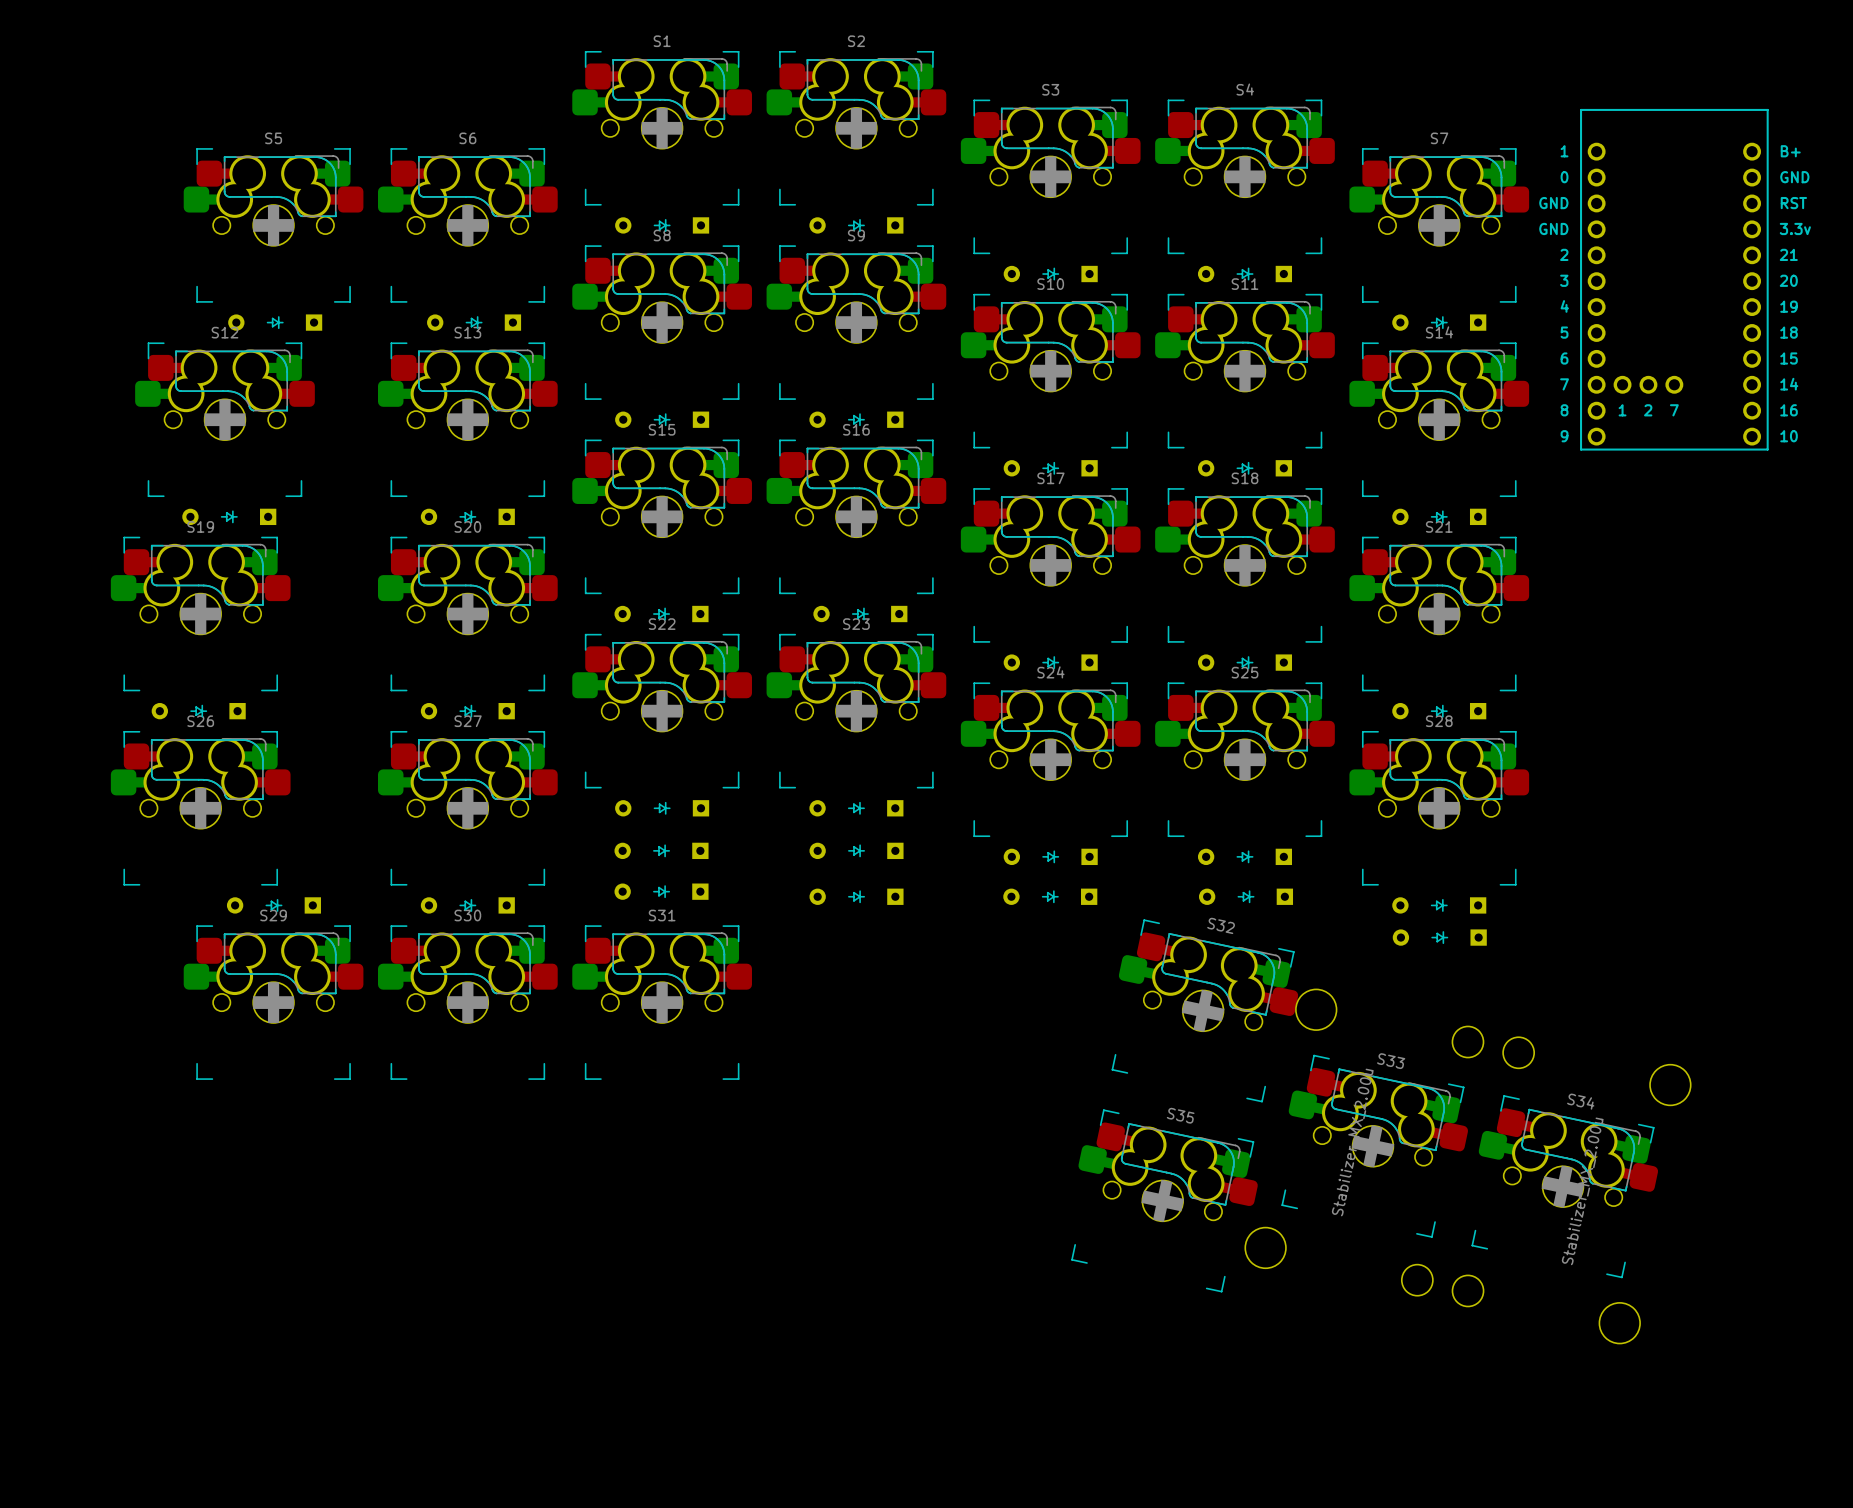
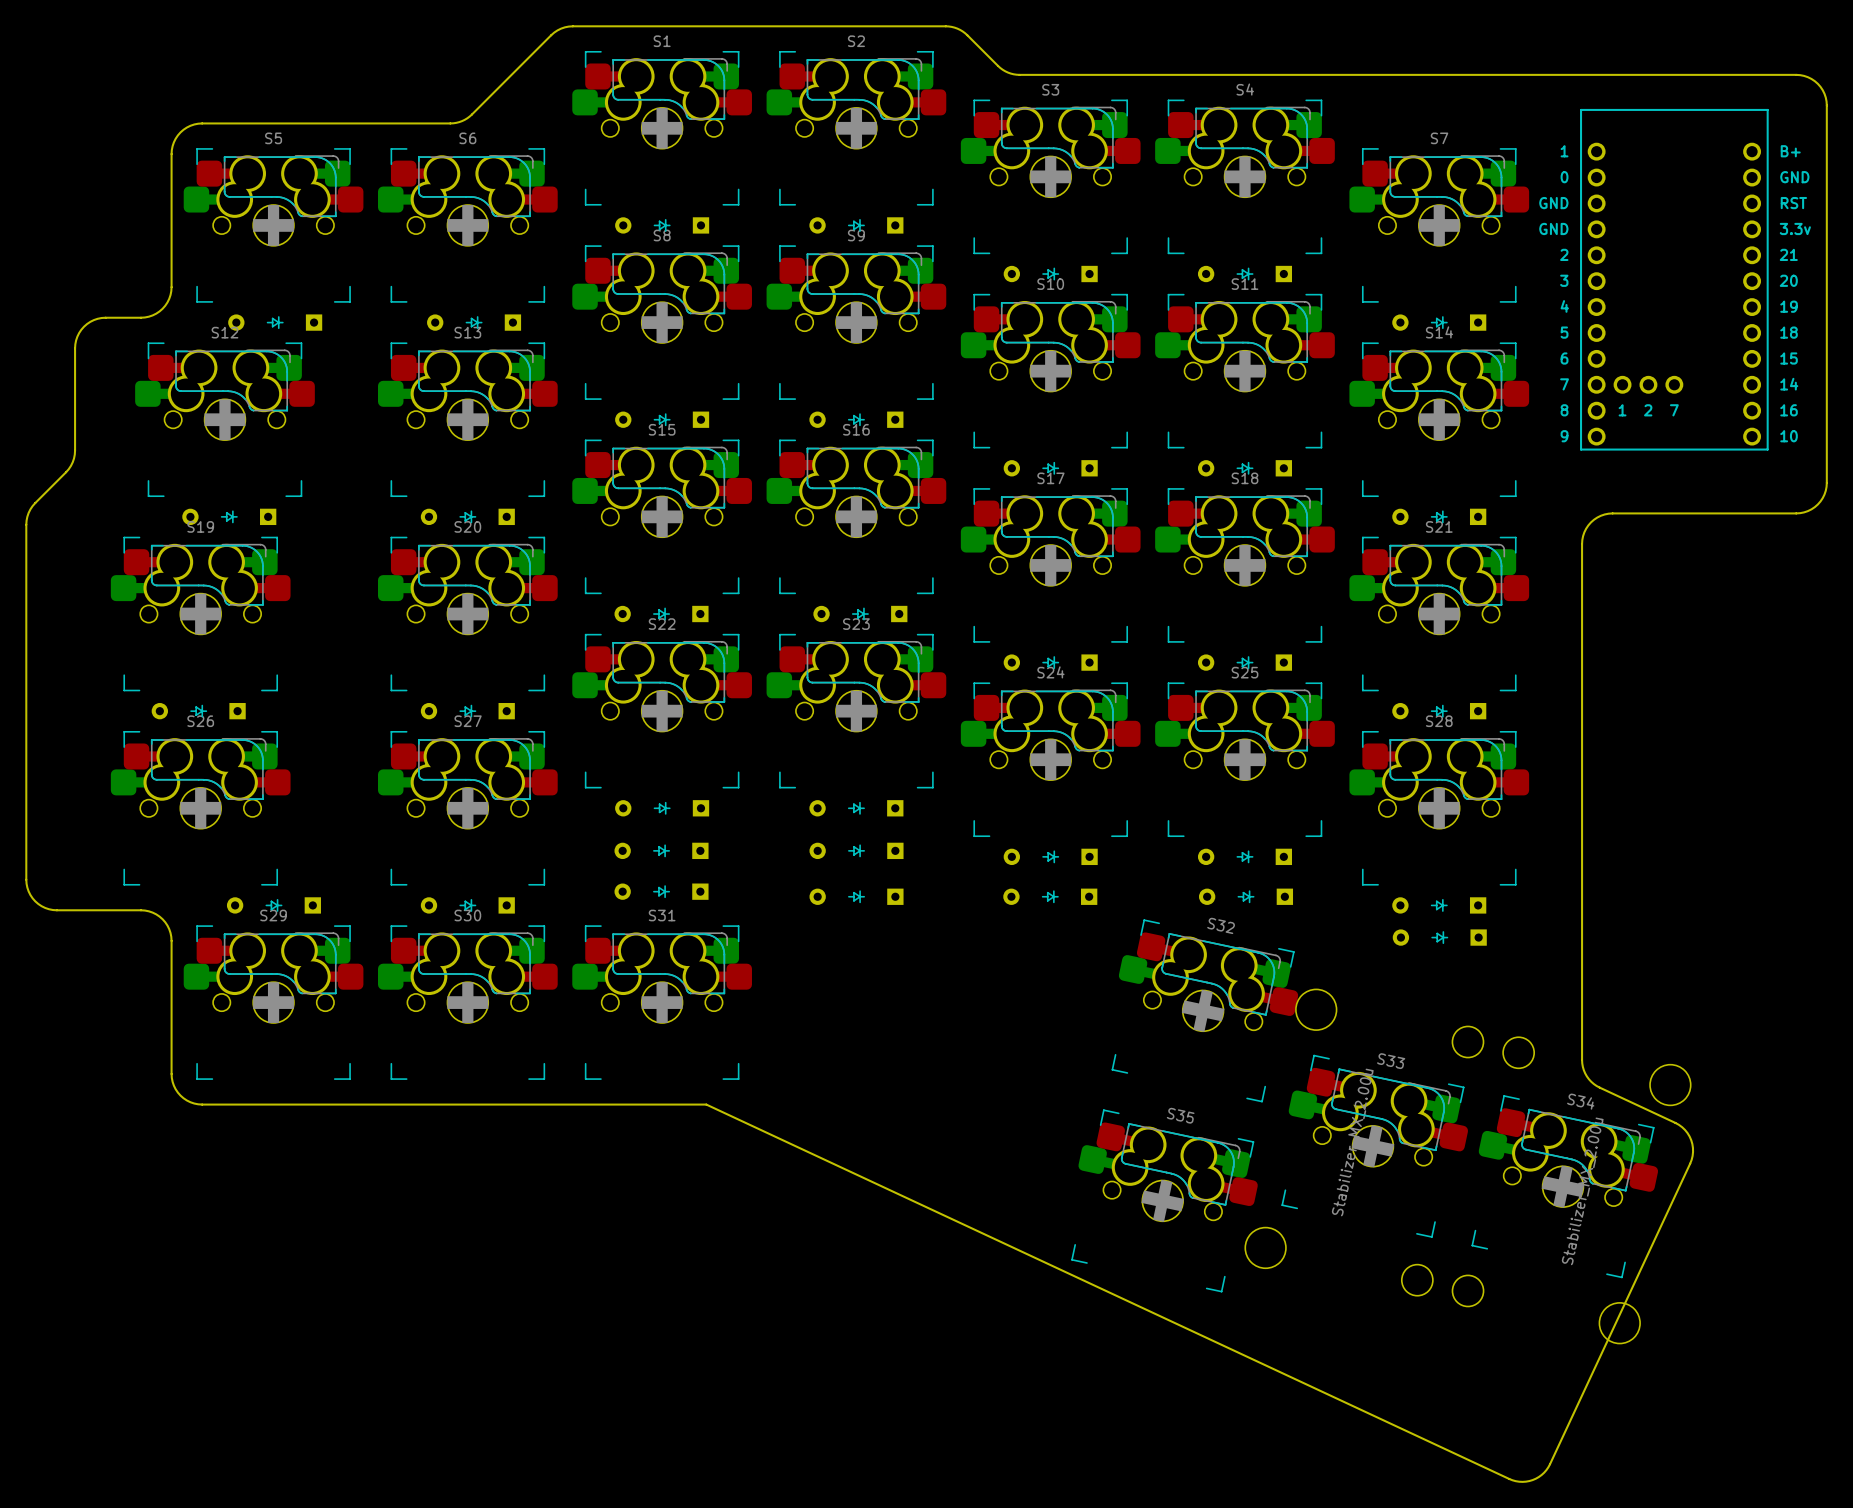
board edge: none -> (572, 26) (948, 26) (965, 33) (1002, 69) (1016, 74) (1796, 74) (1811, 78) (1822, 90) (1826, 105) (1826, 482) (1822, 498) (1811, 509) (1800, 513) (1608, 513) (1600, 515) (1591, 522) (1583, 536) (1582, 1066) (1586, 1076) (1596, 1085) (1682, 1127) (1691, 1140) (1693, 1151) (1690, 1163) (1550, 1464) (1538, 1477) (1526, 1481) (1509, 1478) (706, 1104) (202, 1104) (190, 1102) (177, 1092) (171, 1077) (171, 940) (170, 932) (165, 922) (156, 914) (144, 910) (48, 909) (38, 903) (30, 894) (26, 879) (26, 520) (32, 506) (68, 469) (74, 458) (75, 348) (79, 333) (87, 324) (97, 318) (140, 317) (152, 315) (162, 308) (169, 298) (171, 287) (171, 154) (175, 138) (186, 127) (202, 123) (459, 122) (471, 114) (554, 32) (564, 27) (572, 26)

